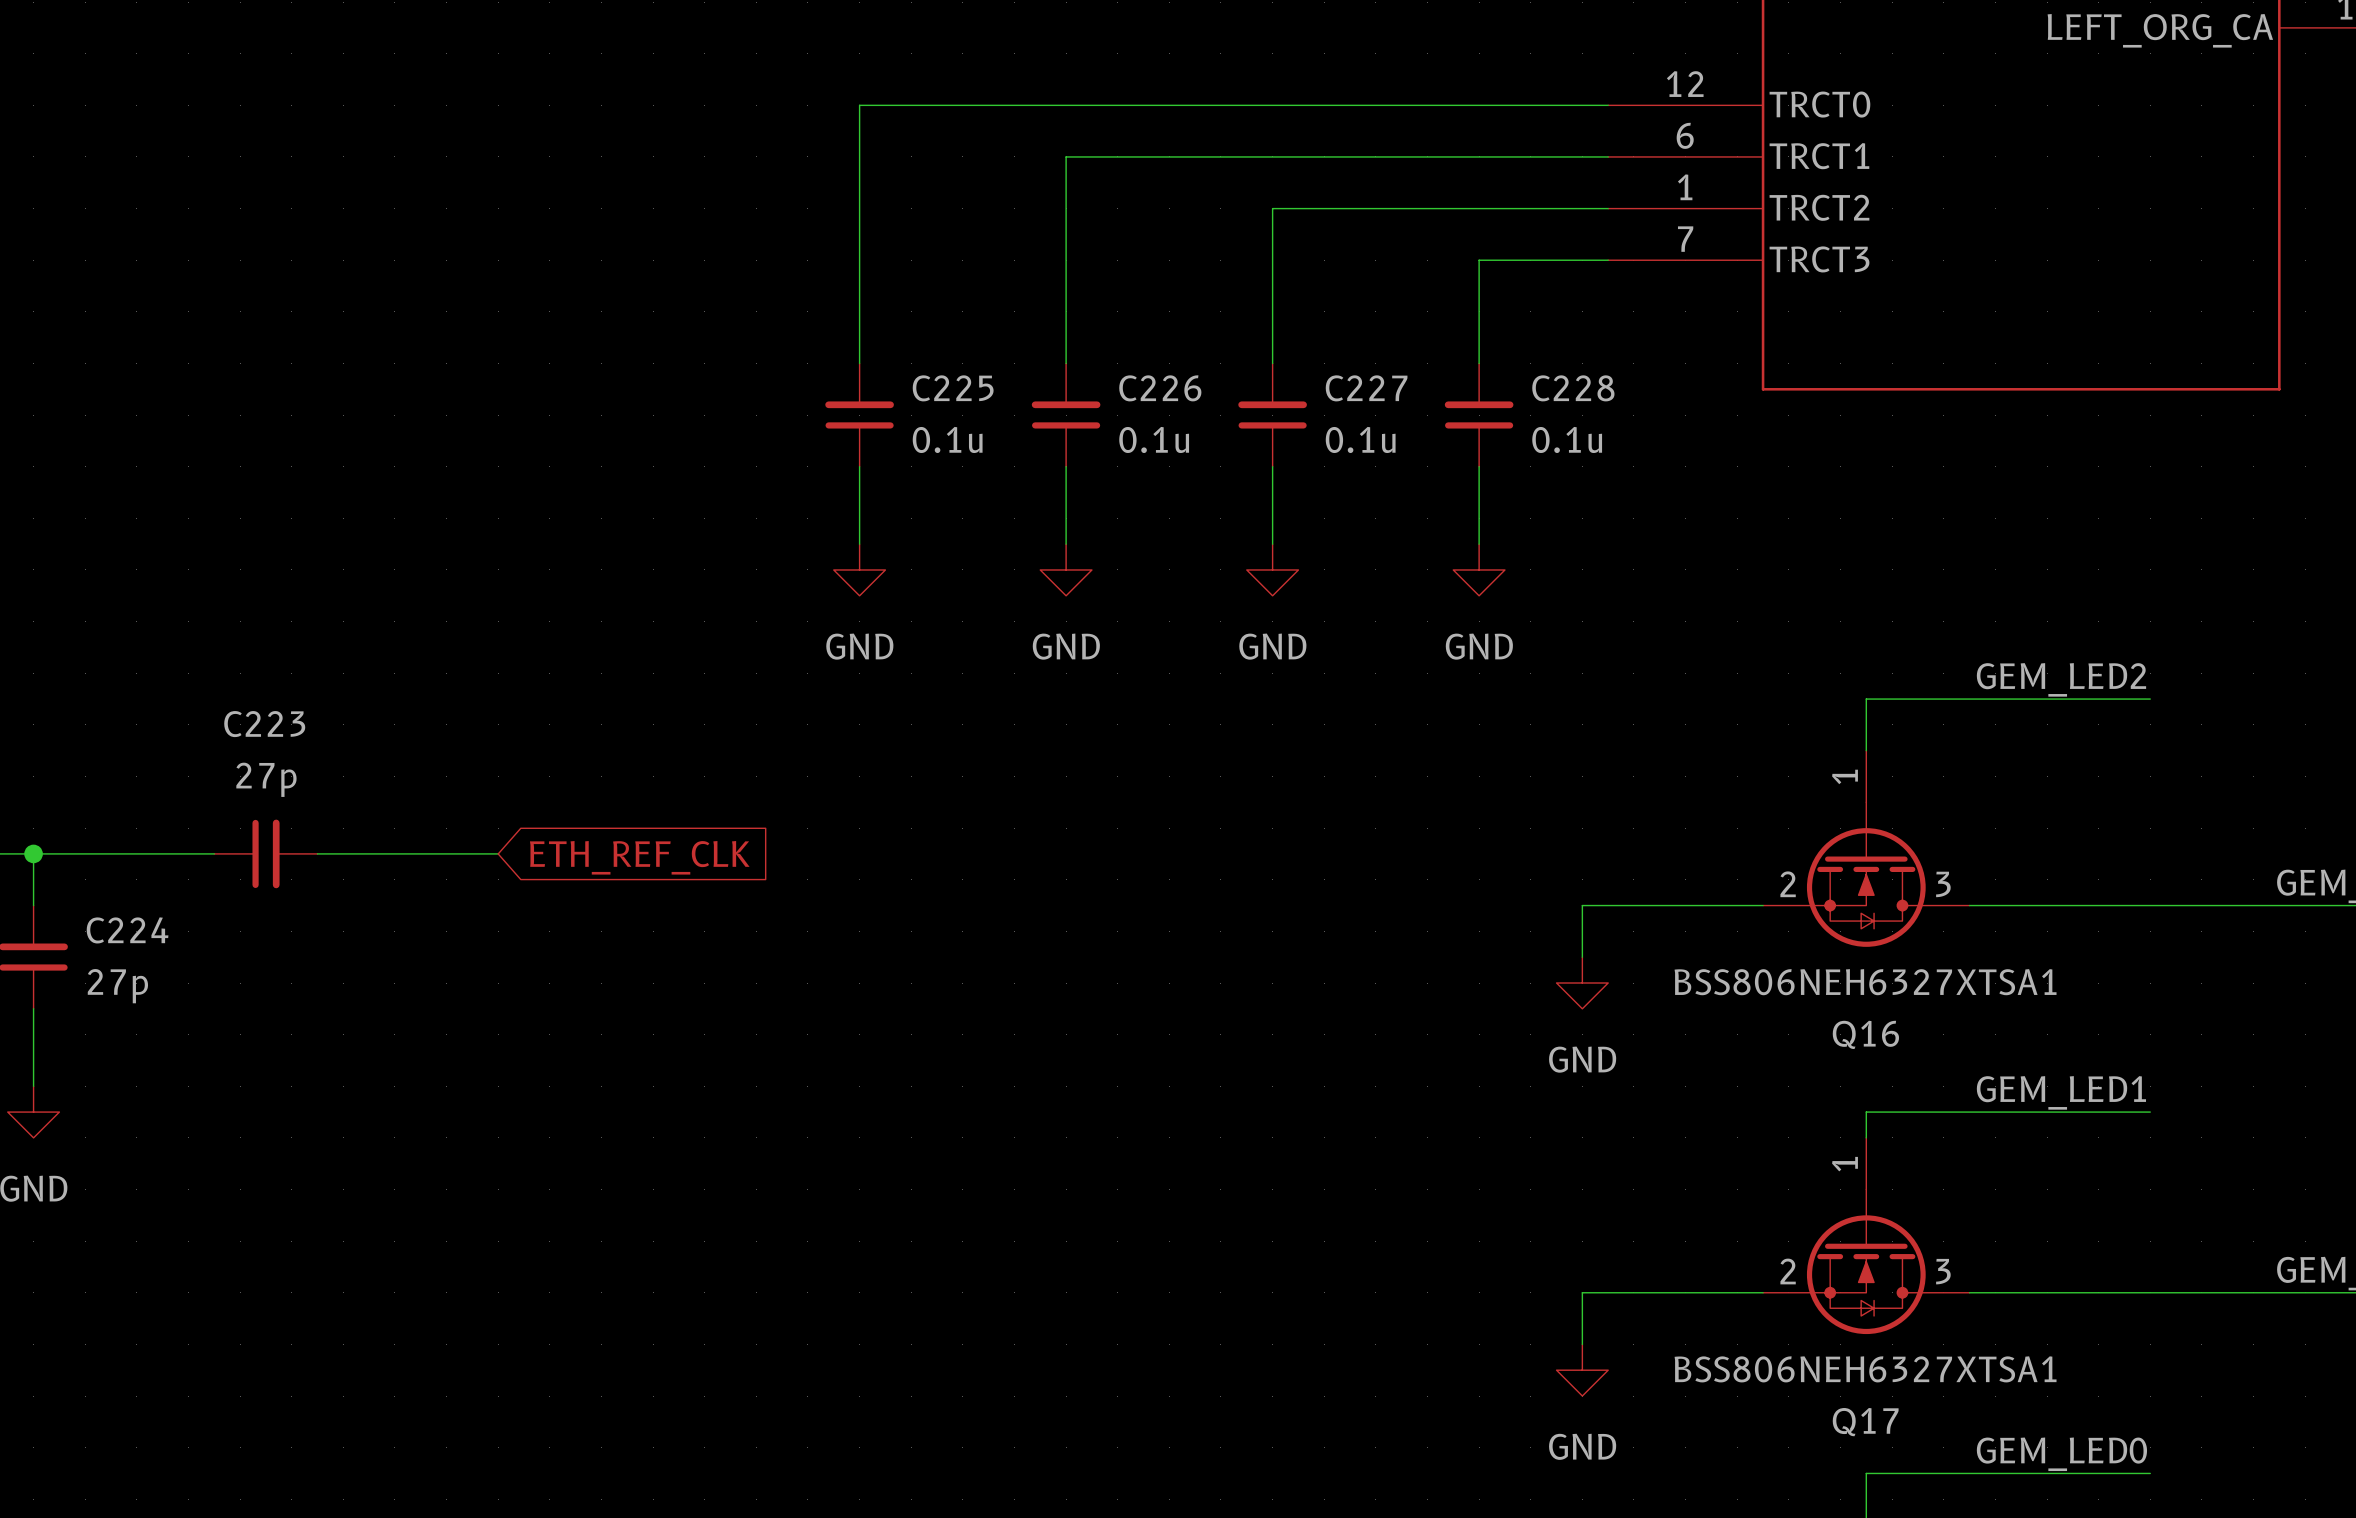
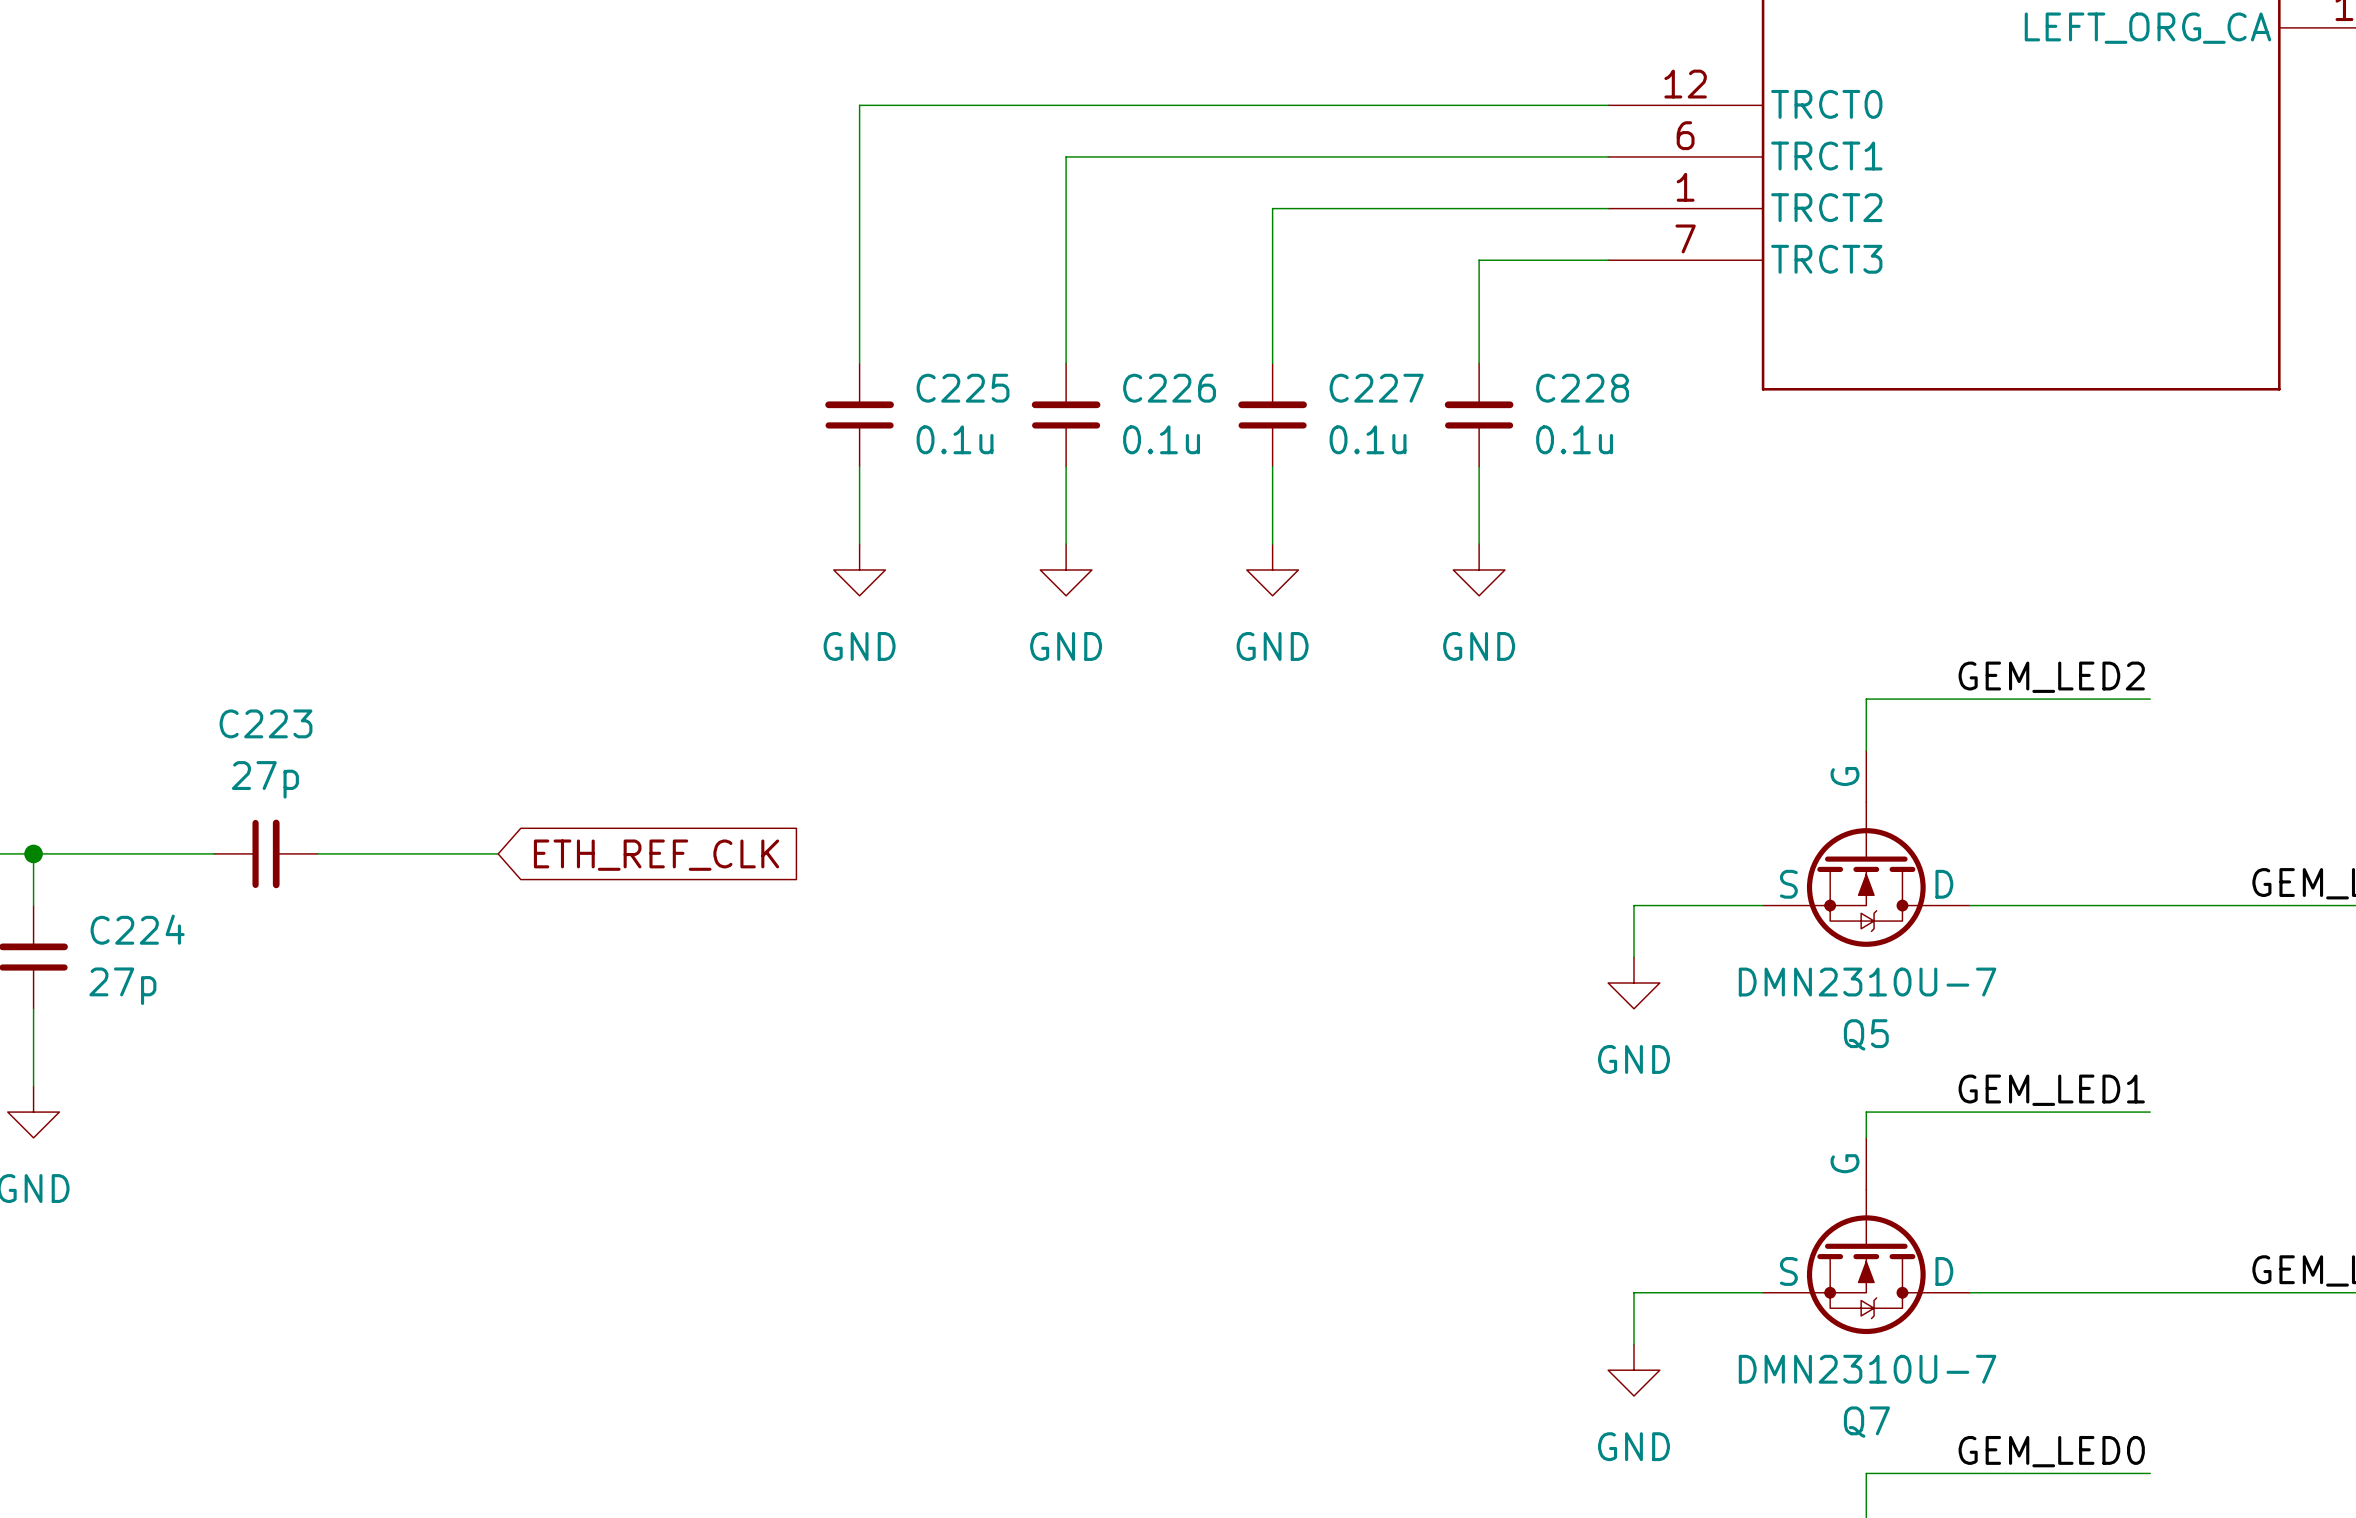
Q16: BSS806NEH6327XTSA1 (1866, 848) -> none
Q5: none -> DMN2310U-7 (1866, 848)
wire: (1633, 905) (1582, 905) (1582, 957) -> (1633, 905) (1633, 957)
power symbol position: GND (1582, 983) -> GND (1633, 983)
Q17: BSS806NEH6327XTSA1 (1866, 1235) -> none
Q7: none -> DMN2310U-7 (1866, 1235)
wire: (1633, 1292) (1582, 1292) (1582, 1344) -> (1633, 1292) (1633, 1344)
power symbol position: GND (1582, 1370) -> GND (1633, 1370)

